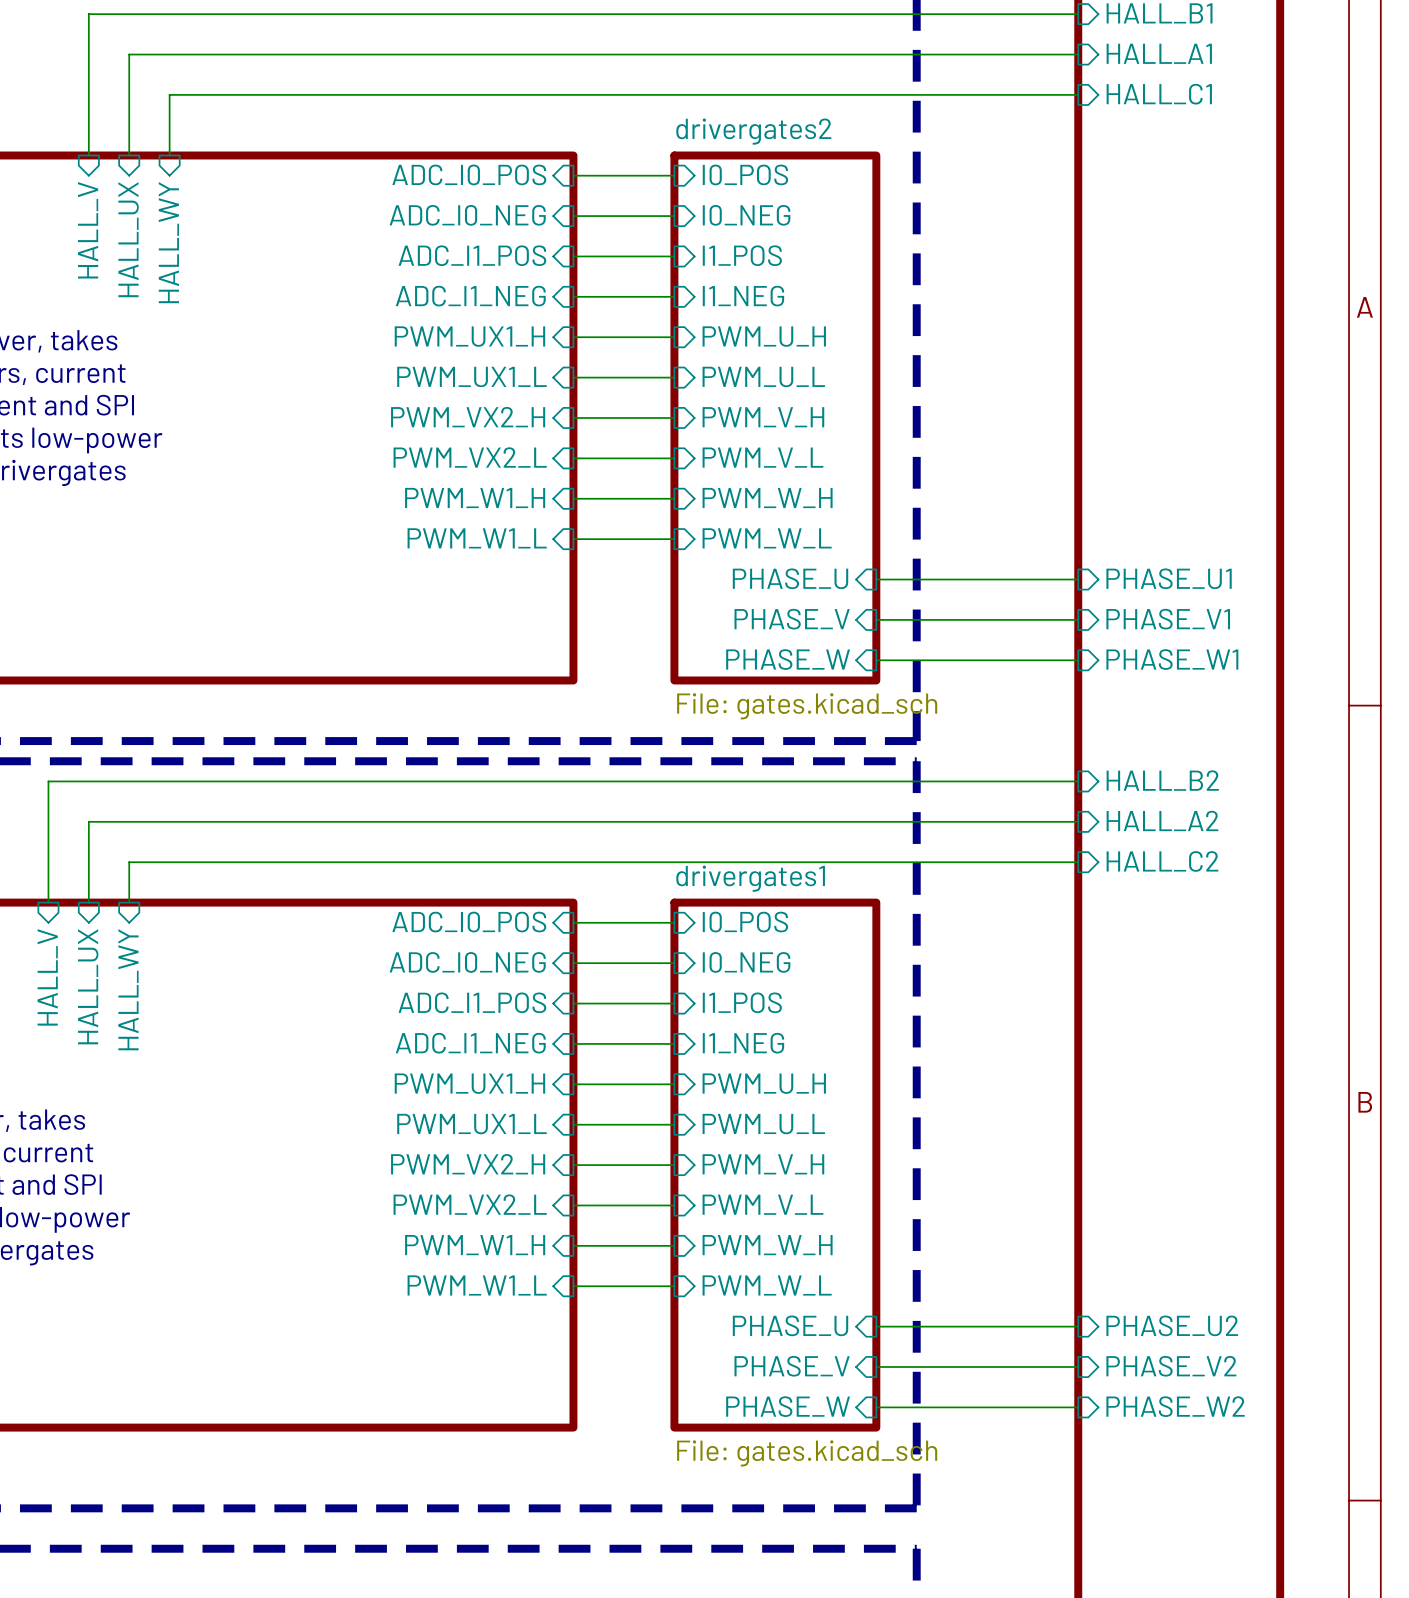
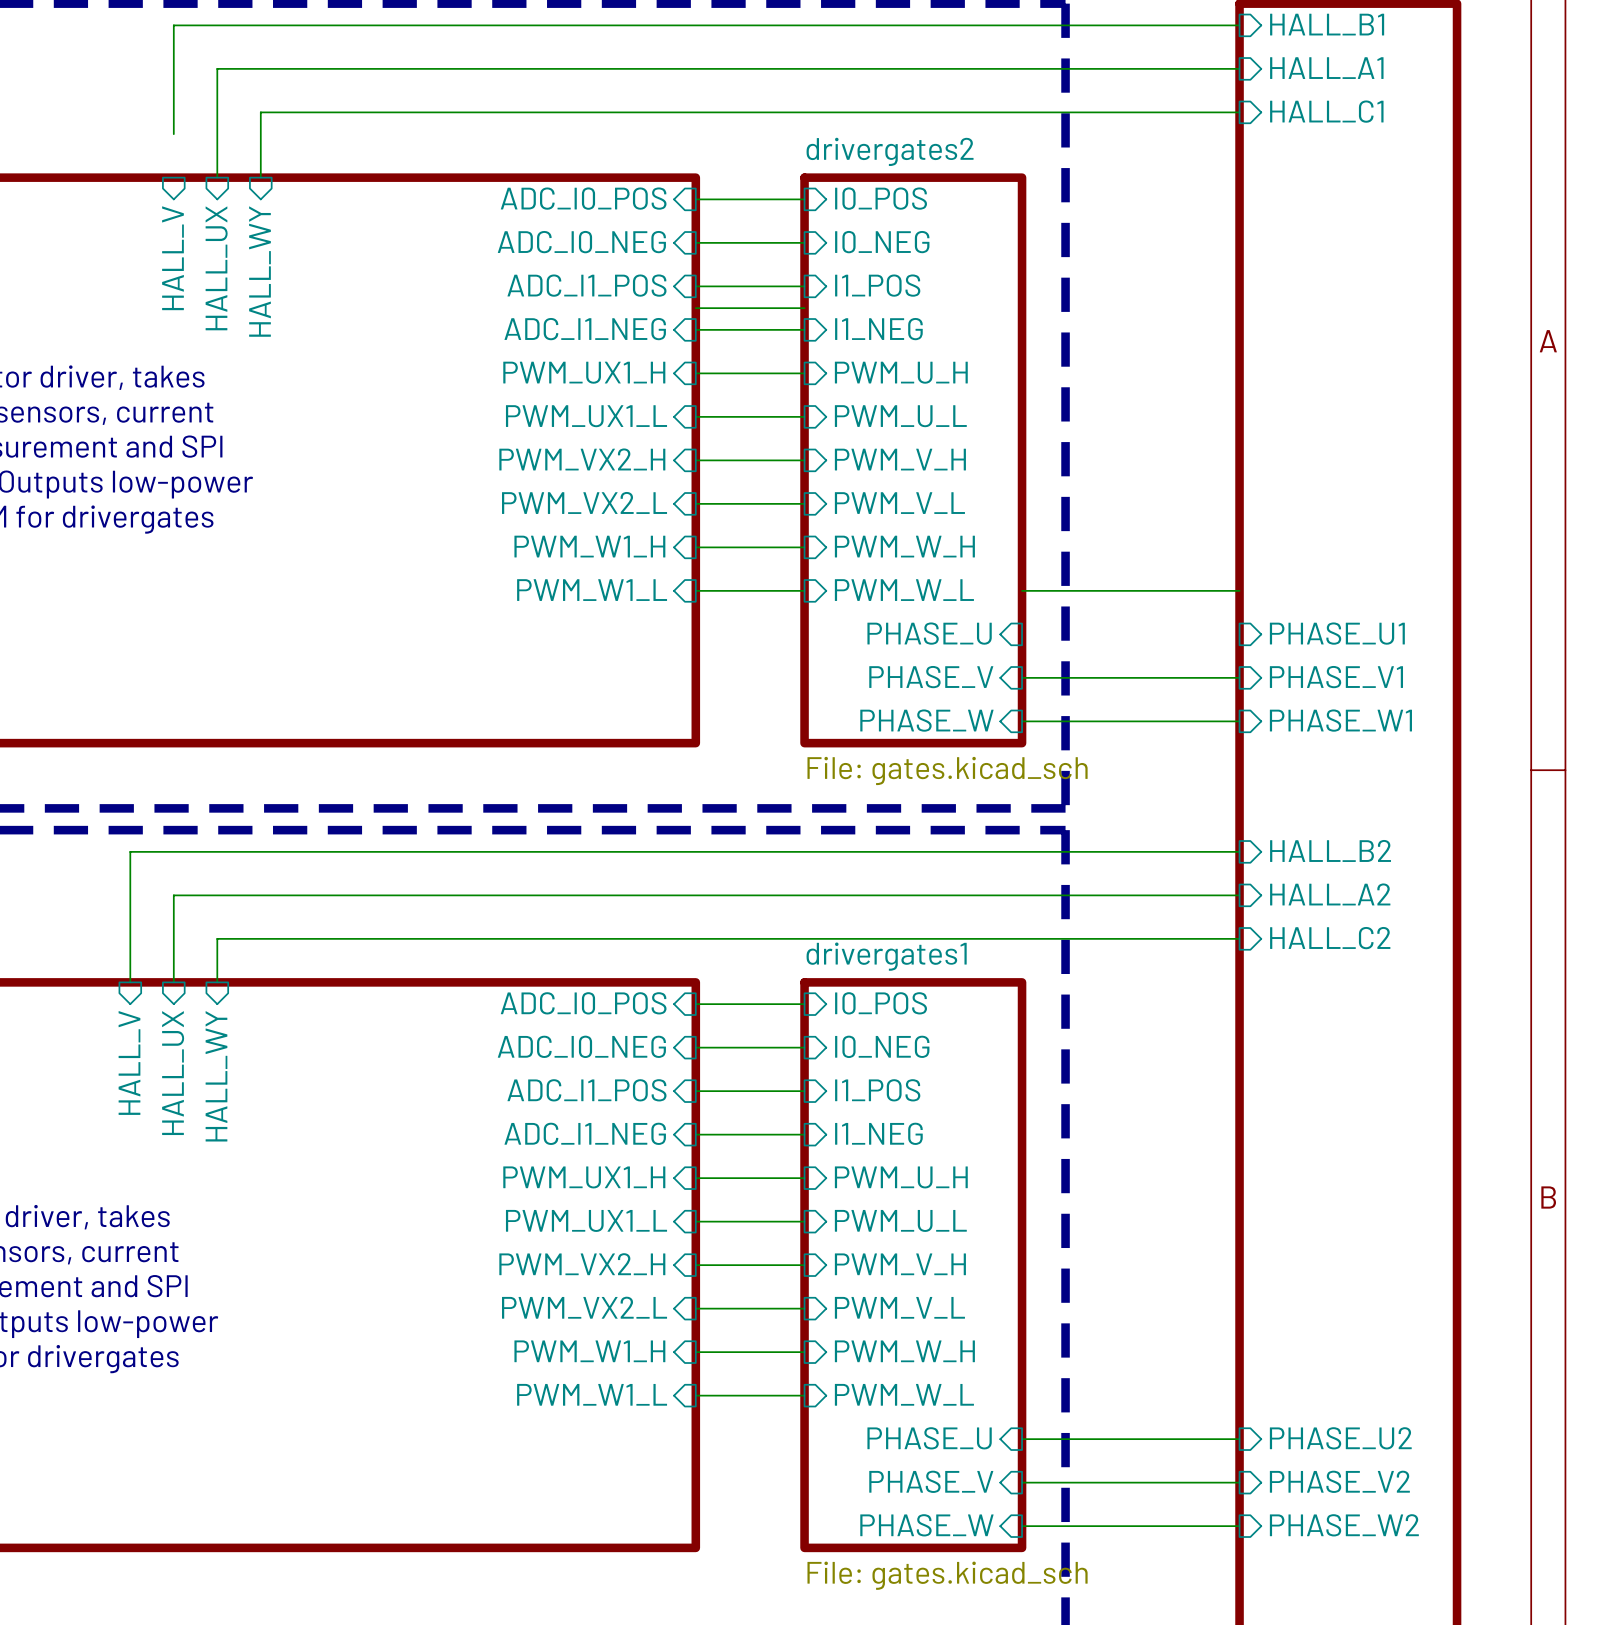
wire: (88, 115) (88, 155) -> none
wire: none -> (695, 308) (804, 308)
wire: (876, 579) (1078, 579) -> (1022, 590) (1239, 590)

